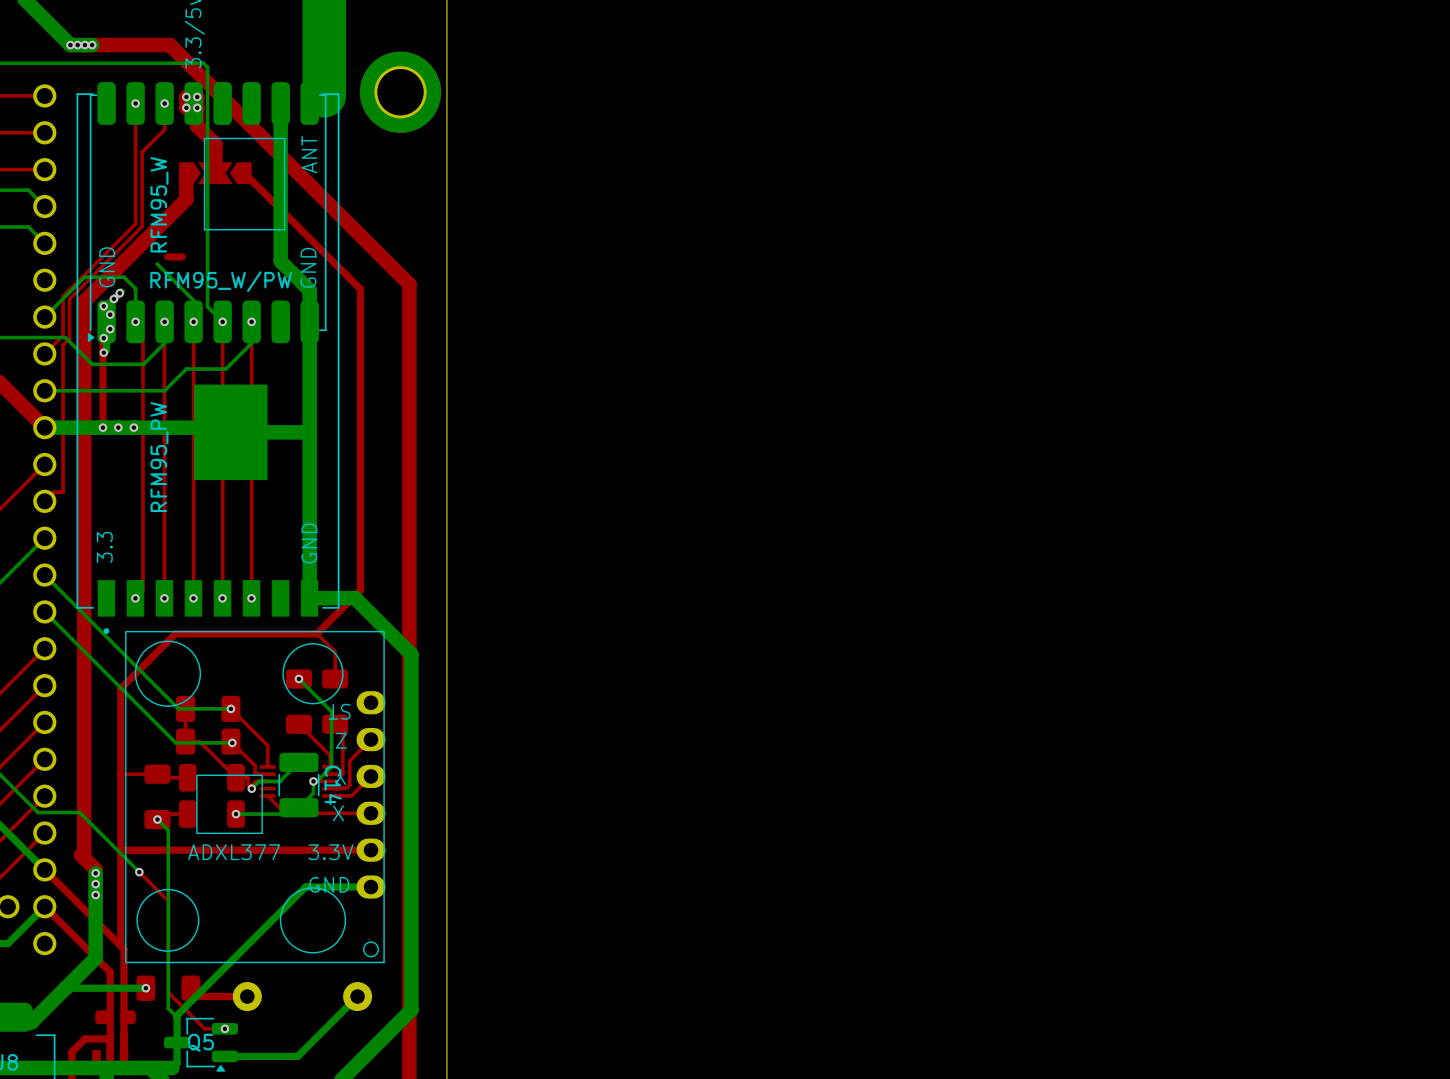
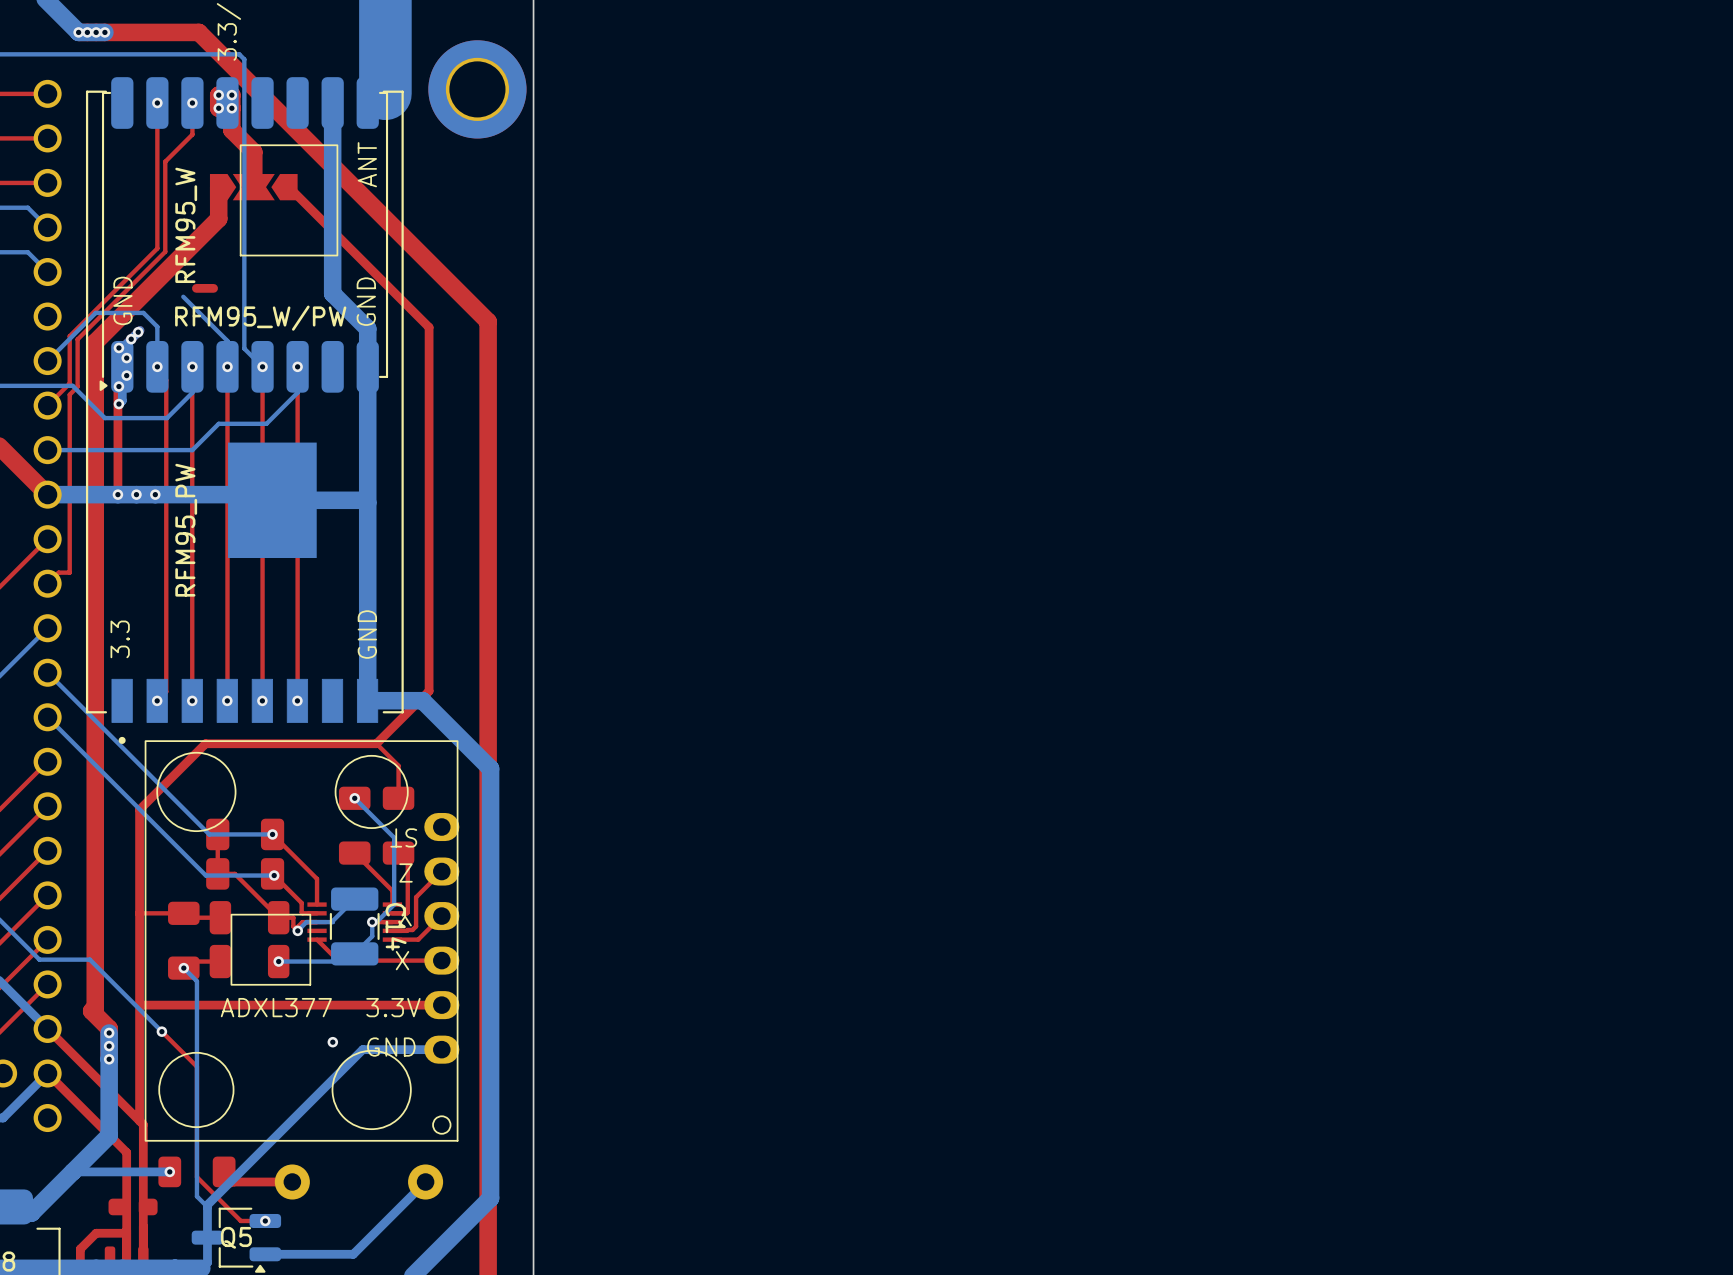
via: none -> (332, 1042)

